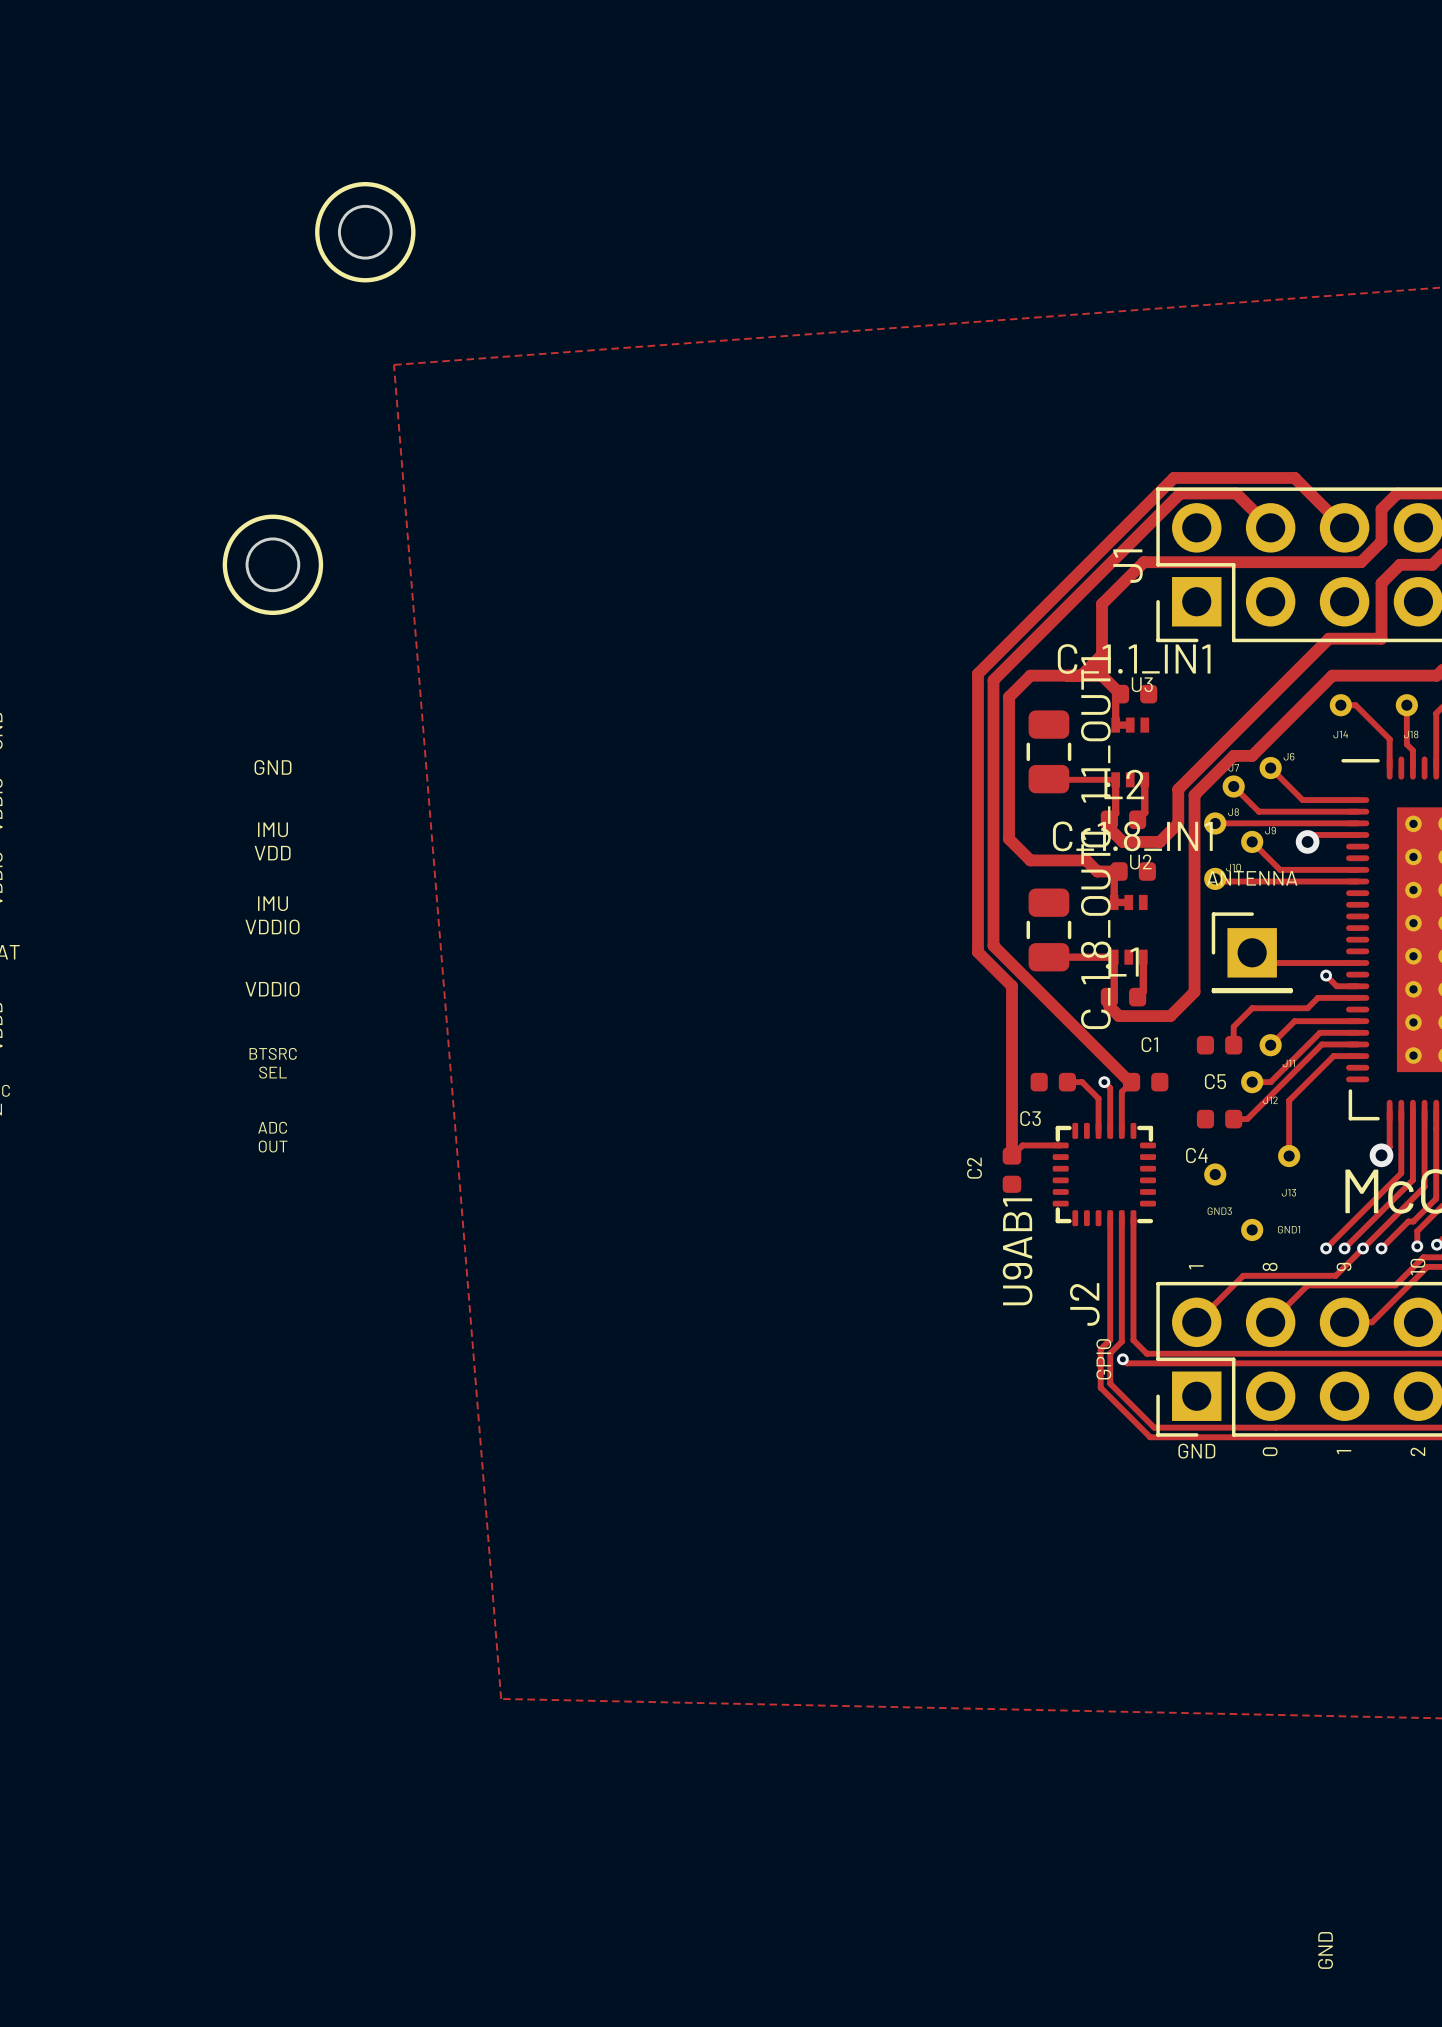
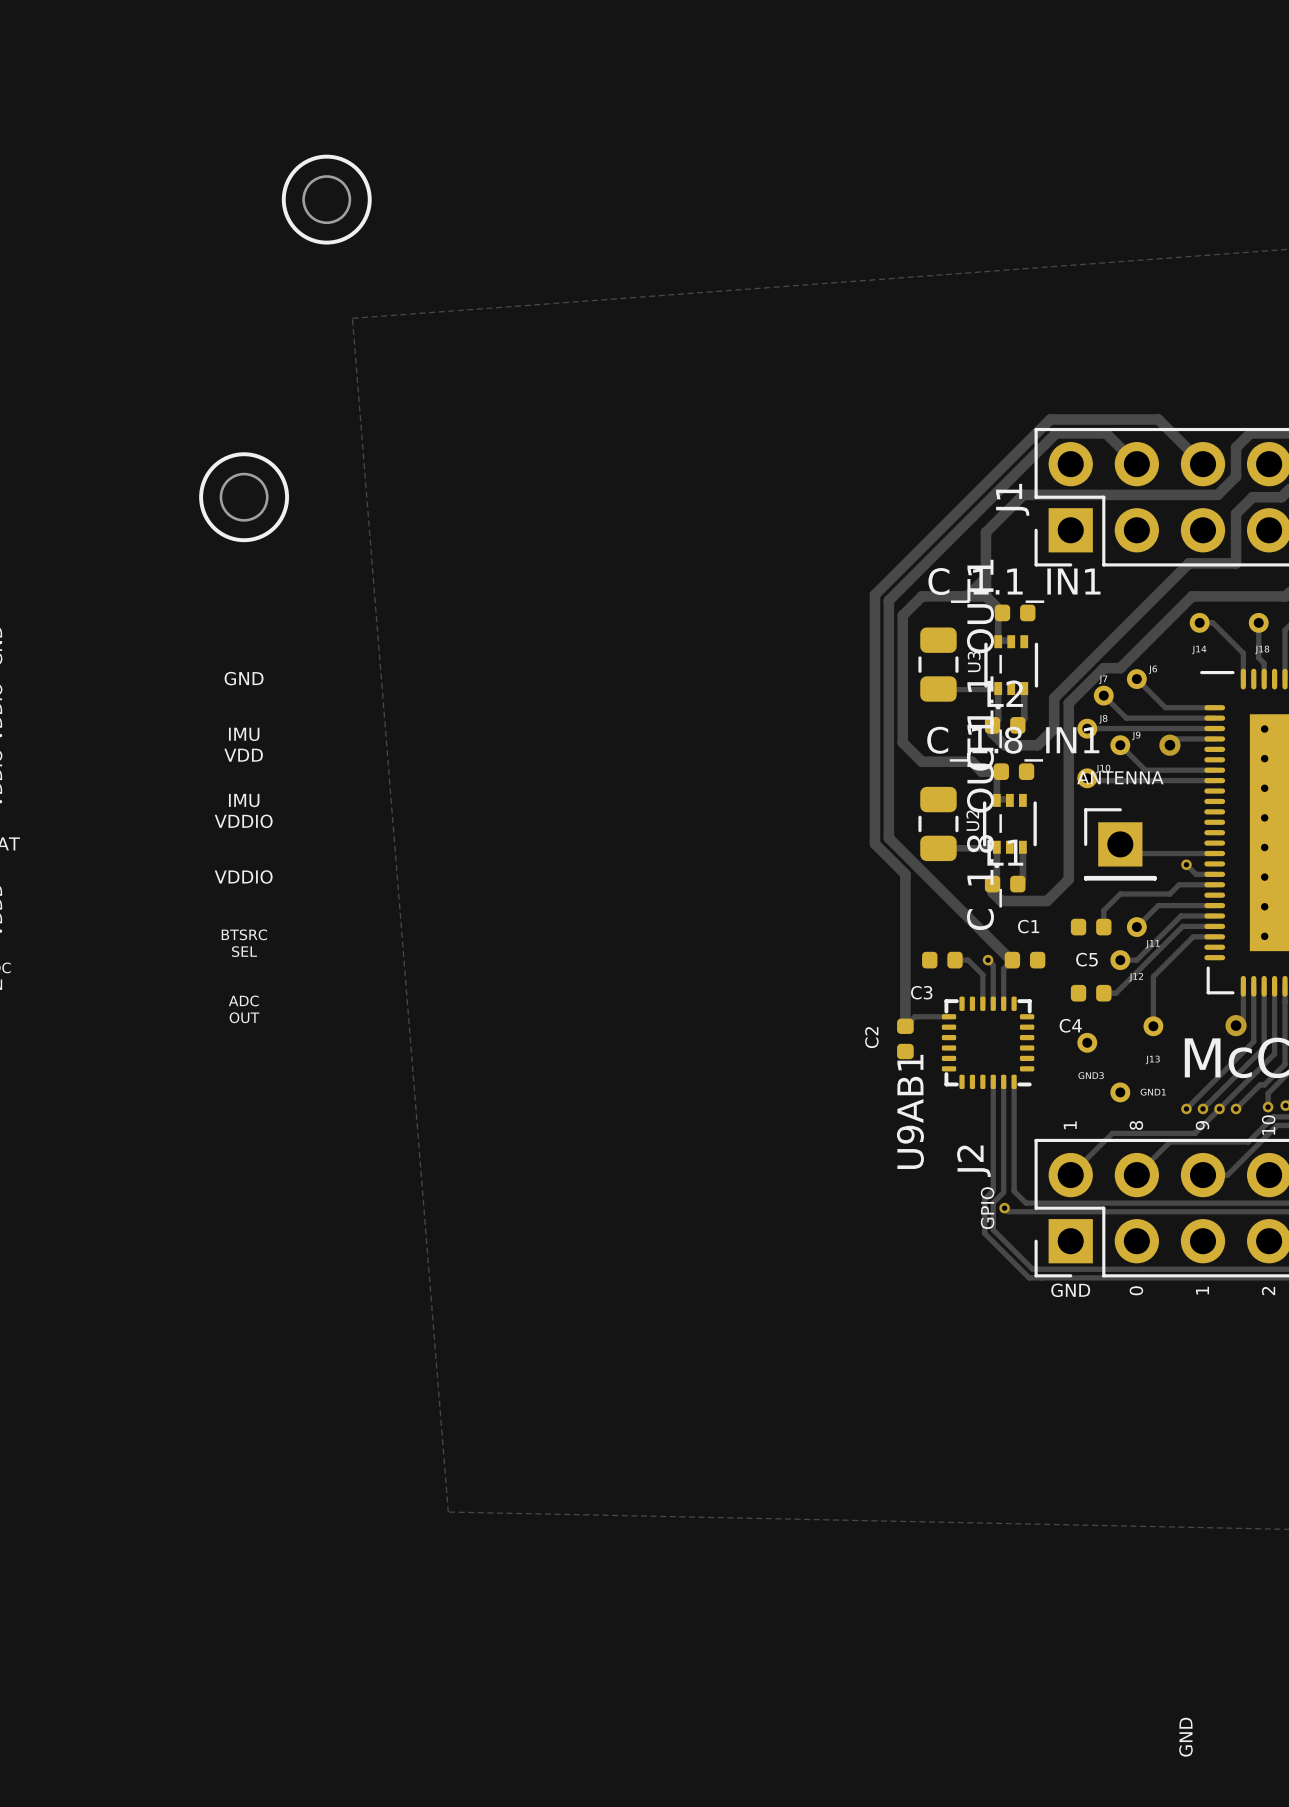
U3 name position: U3 (1142, 684) -> U3 (974, 661)
U3 footprint: [1111, 717, 1150, 788] -> [984, 635, 1039, 710]
U2 name position: U2 (1140, 862) -> U2 (972, 820)
U2 footprint: [1109, 894, 1148, 965] -> [982, 793, 1037, 869]

